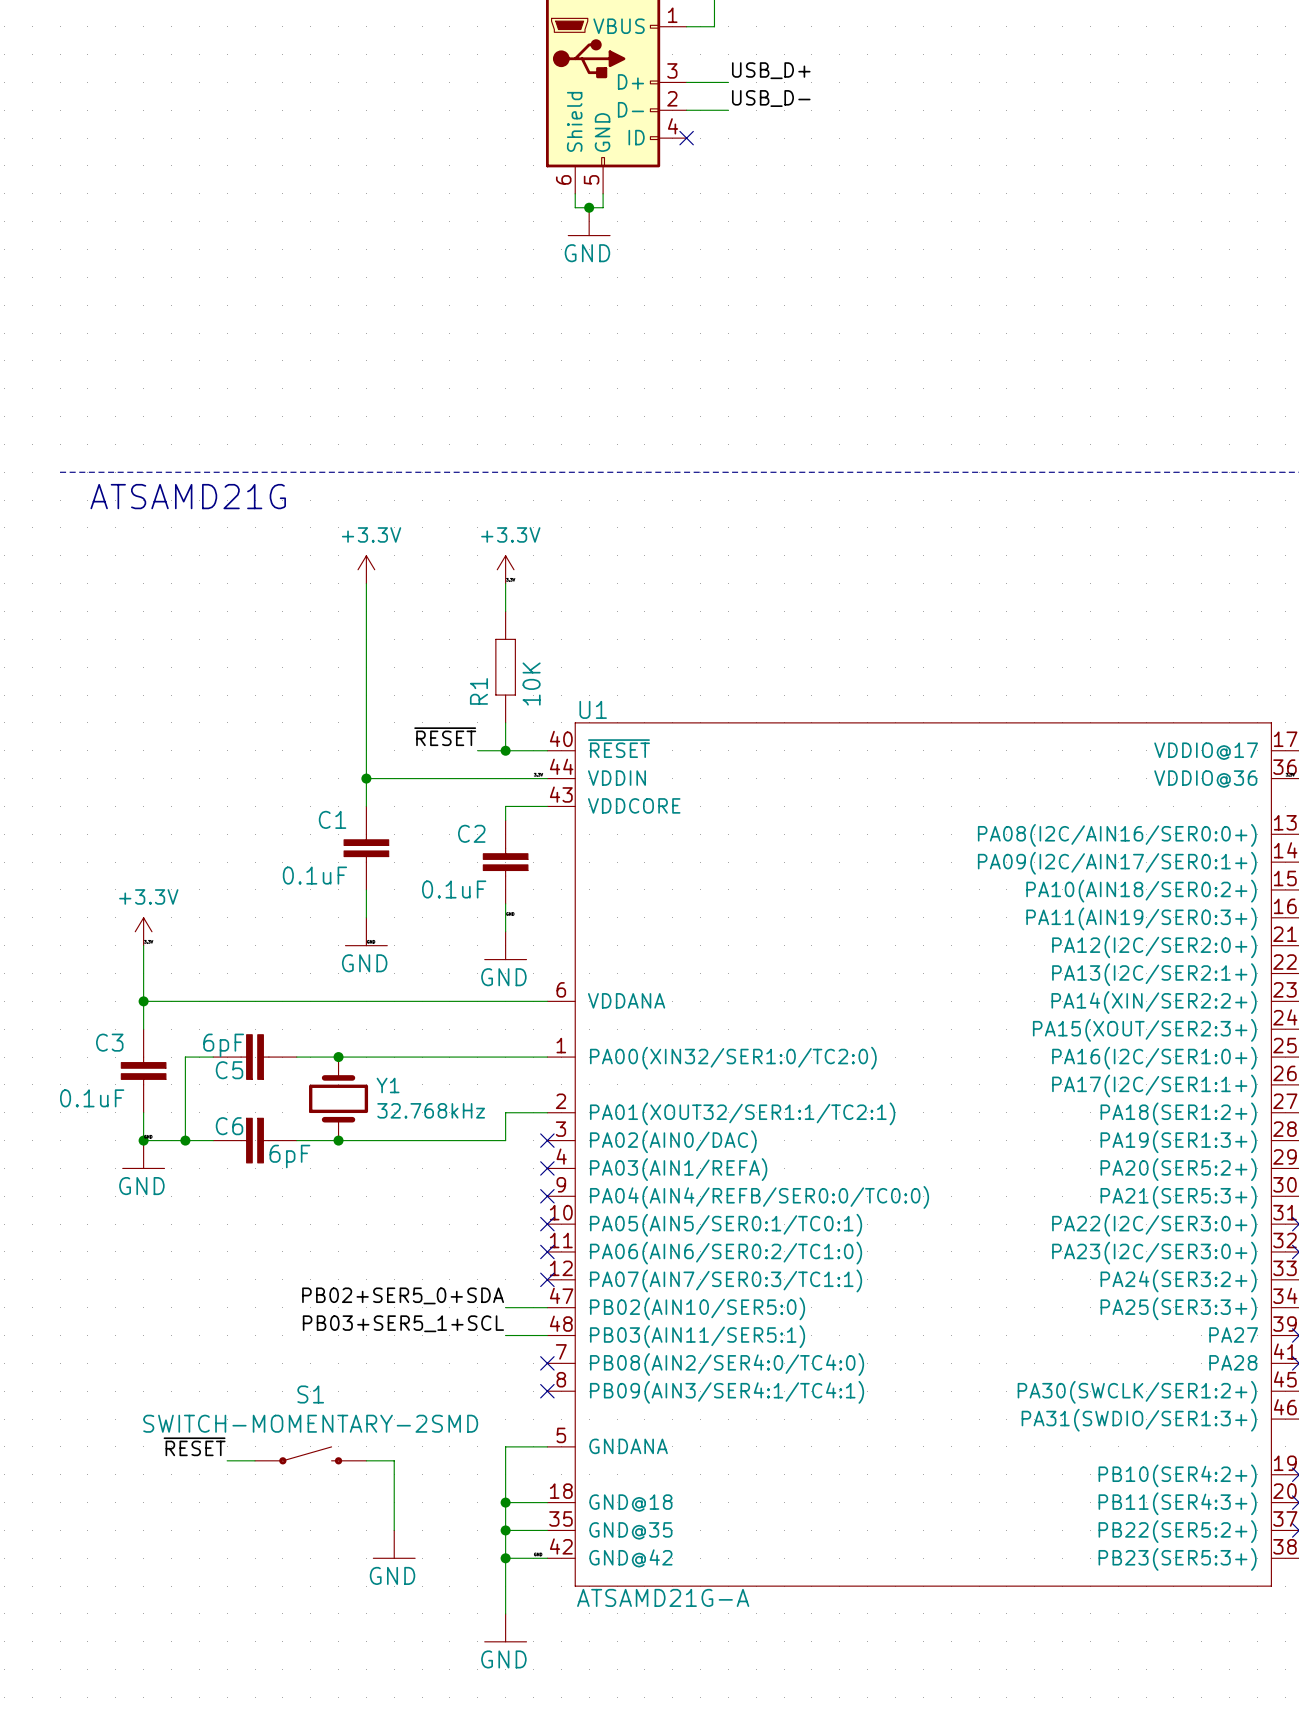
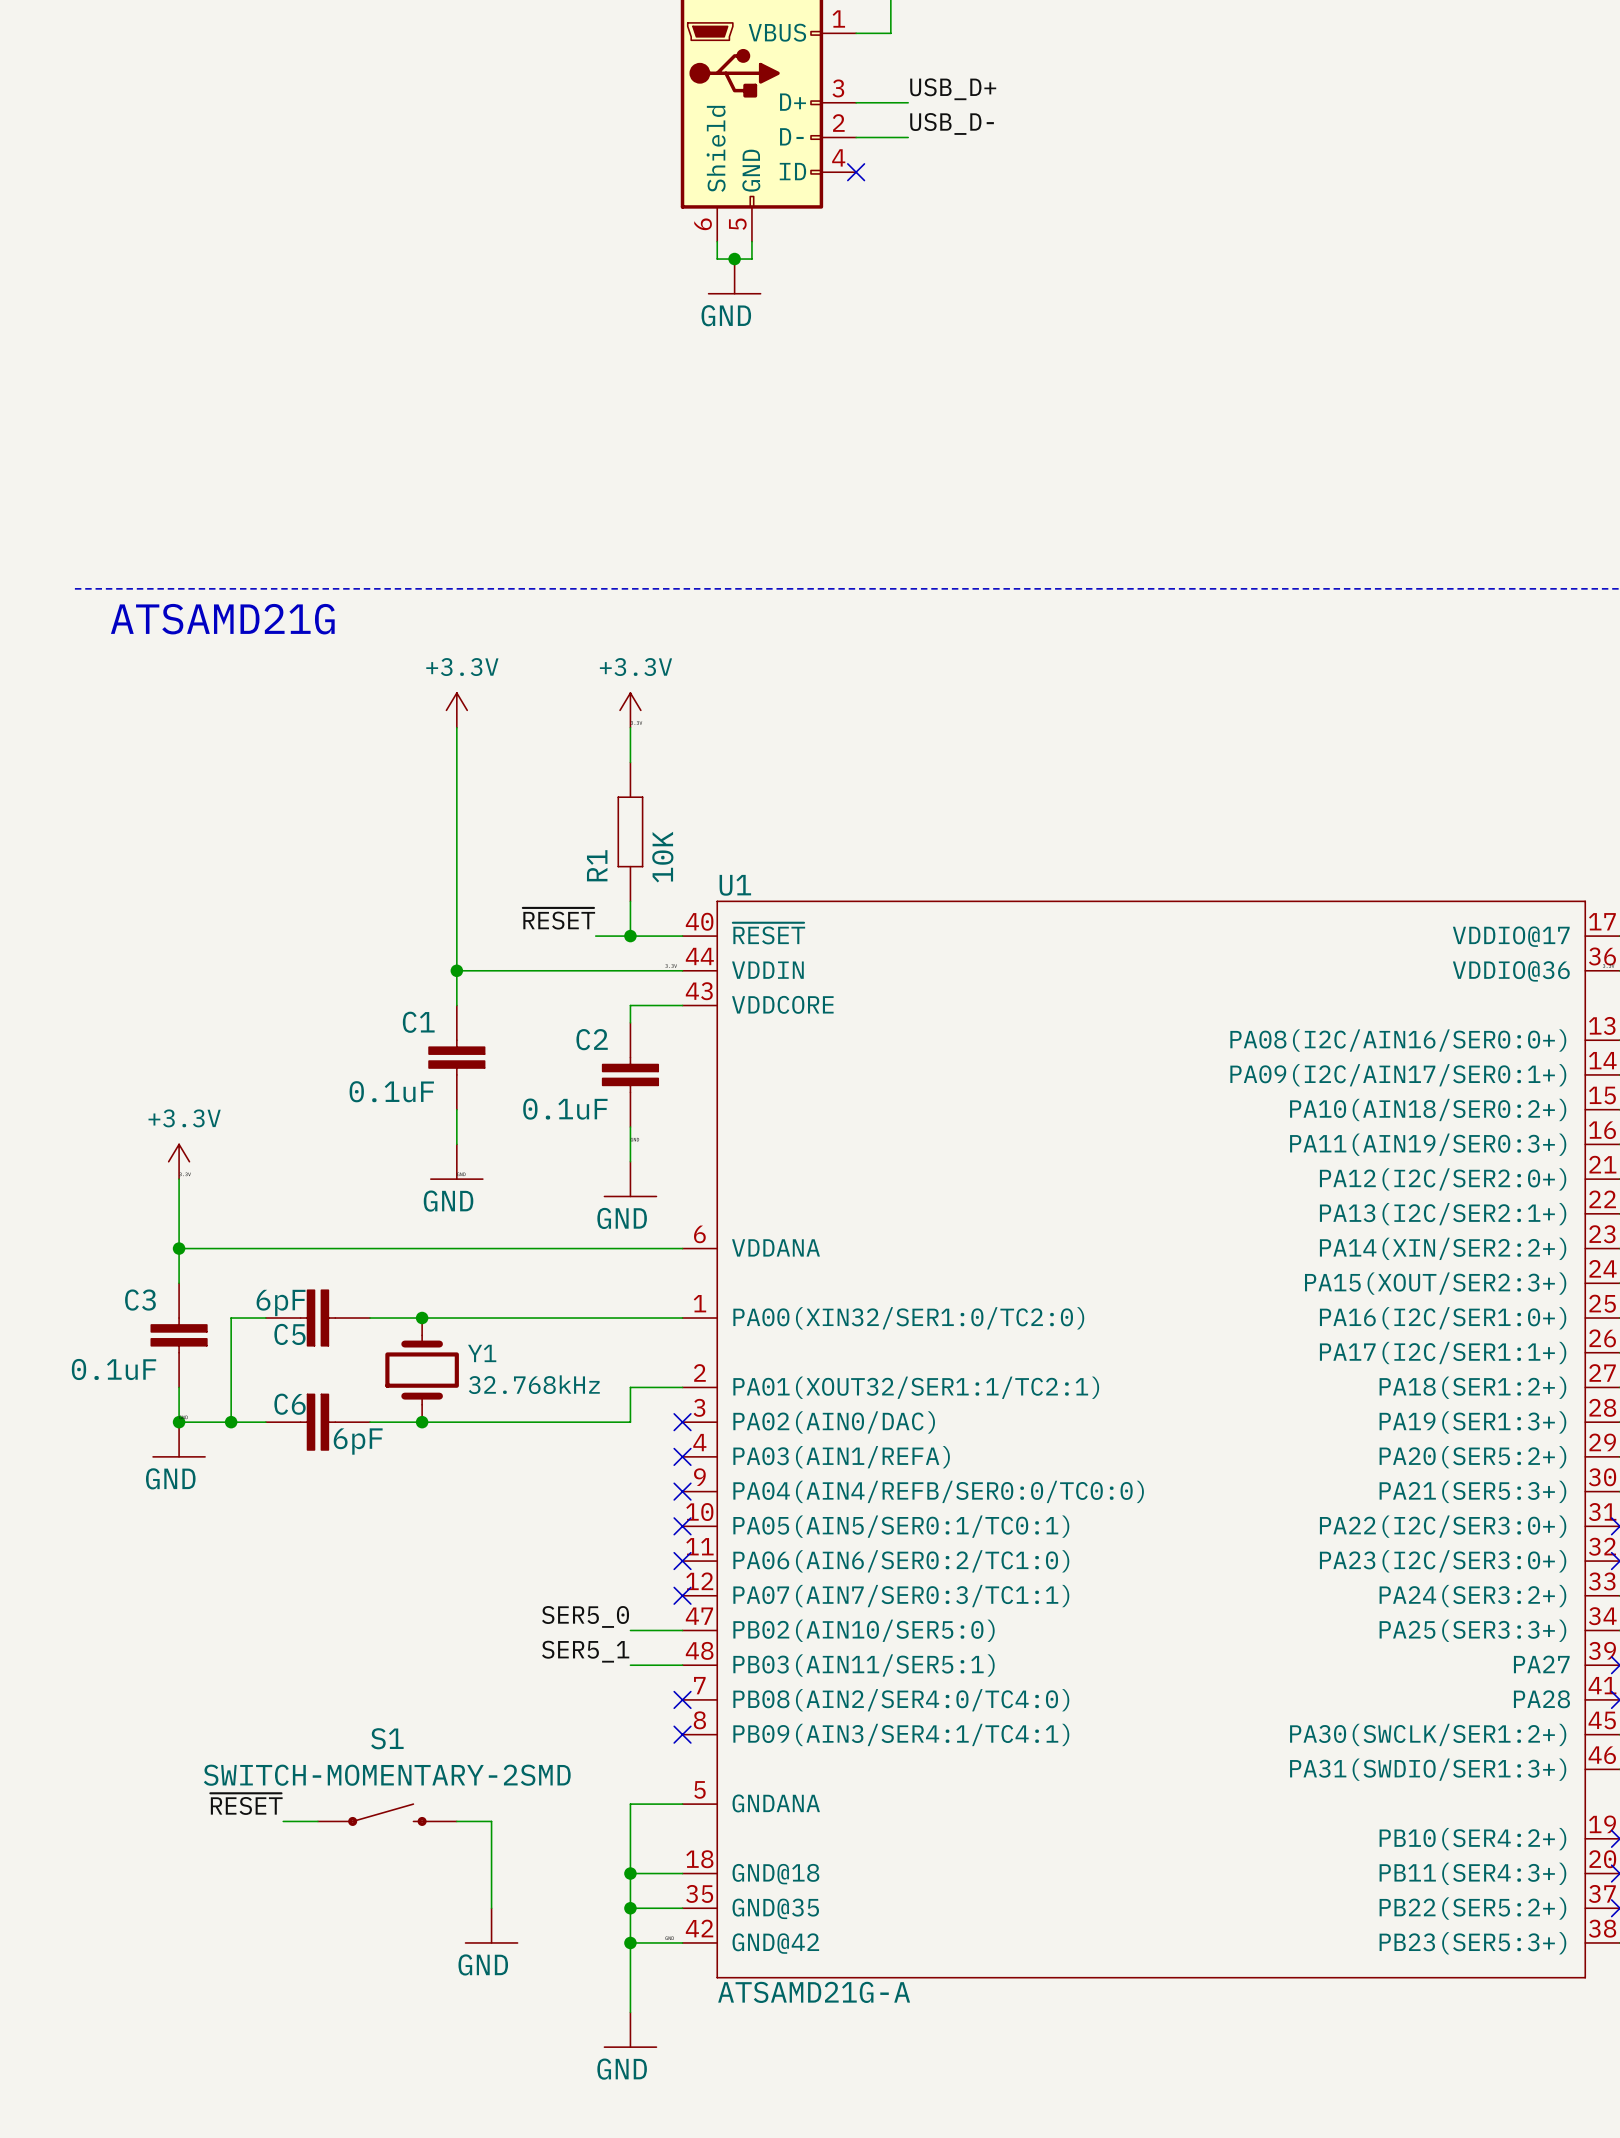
label: PB02+SER5_0+SDA (403, 1295) -> SER5_0 (585, 1616)
label: PB03+SER5_1+SCL (403, 1323) -> SER5_1 (585, 1651)

